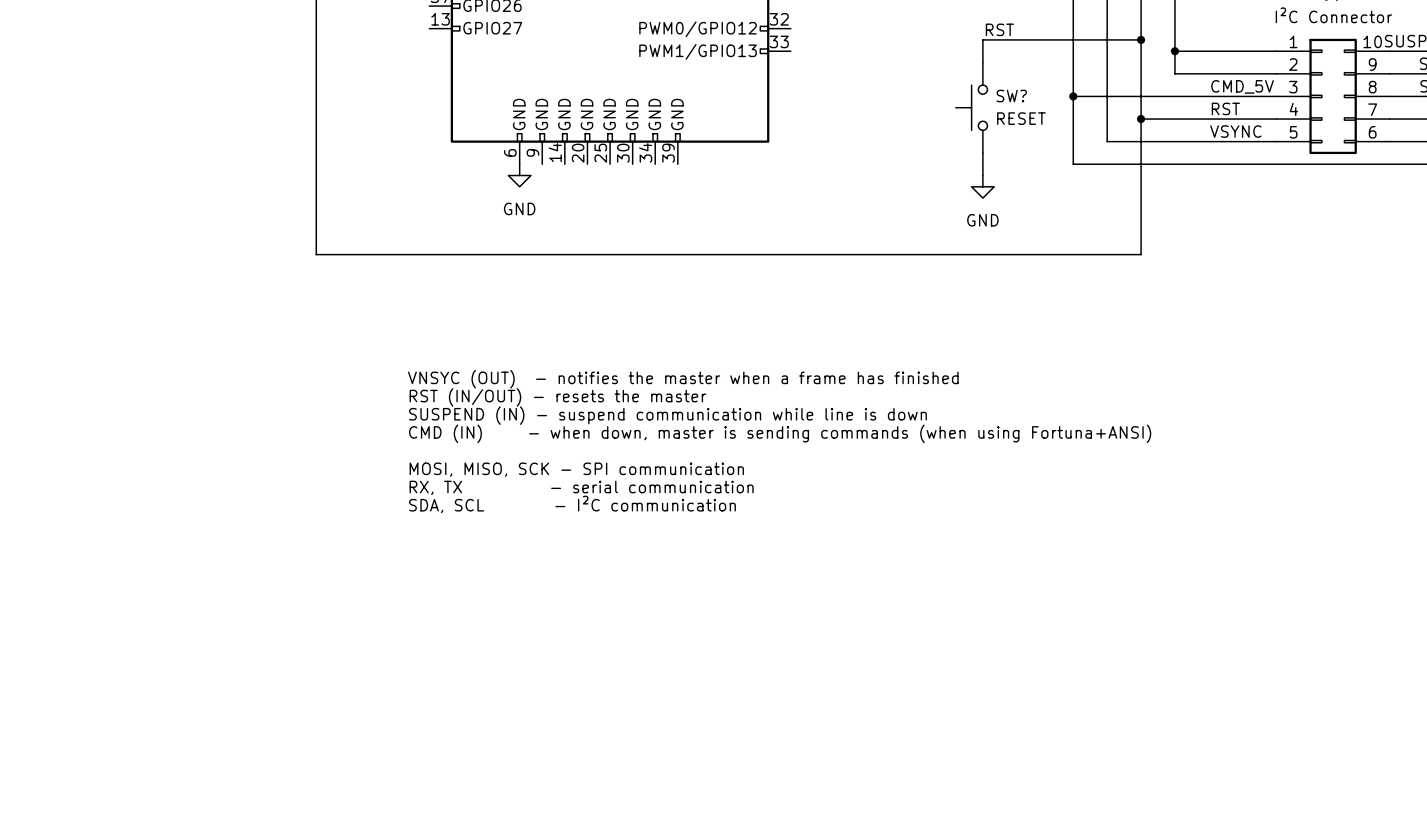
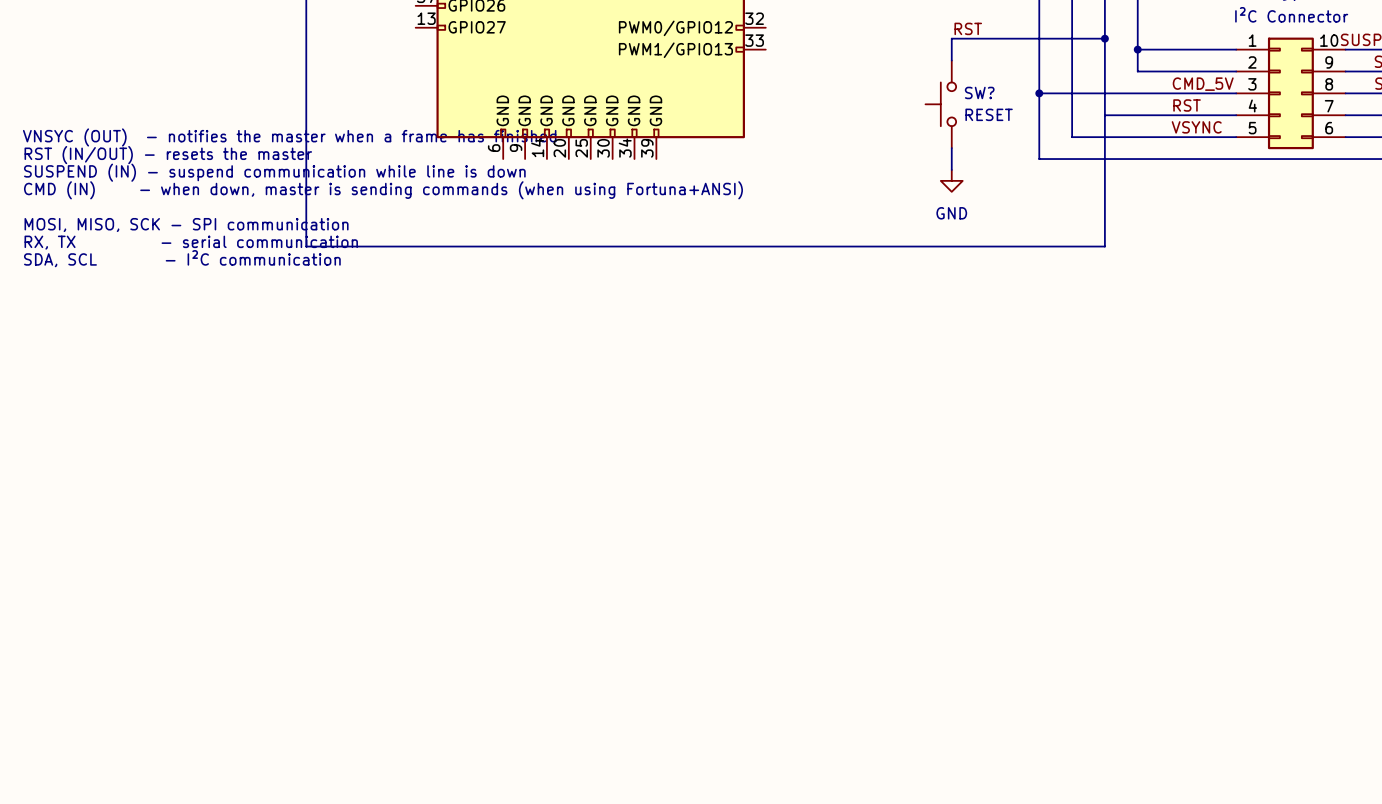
junction: (1141, 119) -> none
text: none -> VNSYC (OUT) - notifies the master when a frame has finished (289, 137)
text: none -> RST (IN/OUT) - resets the master (168, 155)
power symbol: GND (519, 175) -> none
text: none -> SUSPEND (IN) - suspend communication while line is down (274, 172)
text: none -> CMD (IN) - when down, master is sending commands (when using Fortuna+ANSI) (383, 190)
text: none -> MOSI, MISO, SCK - SPI communication (186, 225)
text: none -> RX, TX - serial communication (191, 242)
text: none -> SDA, SCL - I²C communication (182, 258)
text: VNSYC (OUT) - notifies the master when a frame has finished (683, 379) -> none
text: RST (IN/OUT) - resets the master (557, 397) -> none
text: SUSPEND (IN) - suspend communication while line is down (667, 415) -> none
text: CMD (IN) - when down, master is sending commands (when using Fortuna+ANSI) (780, 433) -> none
text: MOSI, MISO, SCK - SPI communication (576, 469) -> none
text: RX, TX - serial communication (581, 487) -> none
text: SDA, SCL - I²C communication (572, 504) -> none

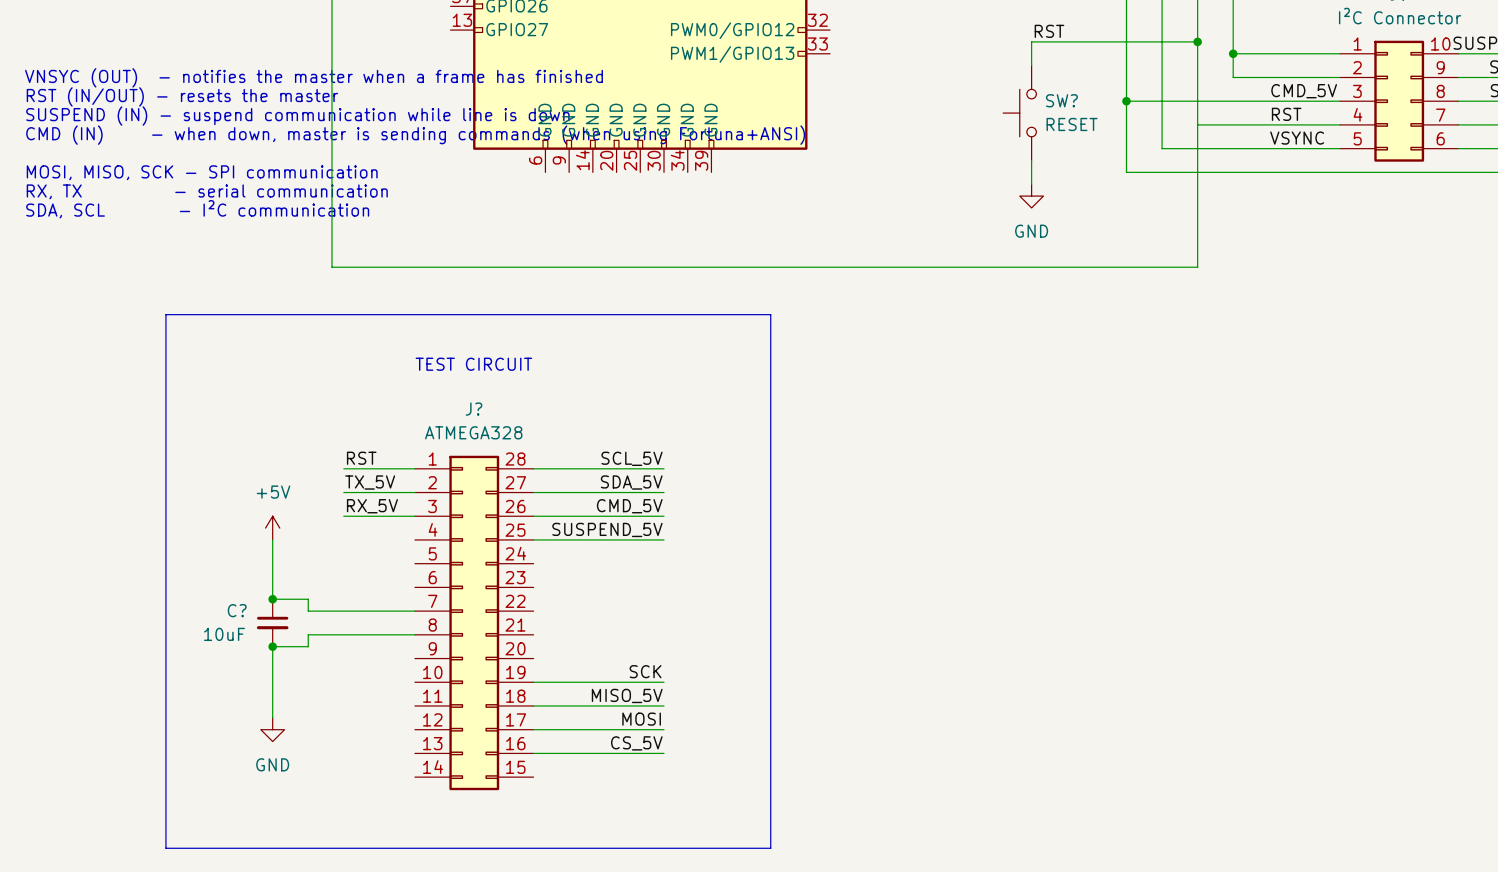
text position: VNSYC (OUT) - notifies the master when a frame has finished (289, 137) -> VNSYC (OUT) - notifies the master when a frame has finished (313, 77)
text position: RST (IN/OUT) - resets the master (168, 155) -> RST (IN/OUT) - resets the master (182, 96)
text position: SUSPEND (IN) - suspend communication while line is down (274, 172) -> SUSPEND (IN) - suspend communication while line is down (297, 116)
text position: CMD (IN) - when down, master is sending commands (when using Fortuna+ANSI) (383, 190) -> CMD (IN) - when down, master is sending commands (when using Fortuna+ANSI) (415, 135)
text position: MOSI, MISO, SCK - SPI communication (186, 225) -> MOSI, MISO, SCK - SPI communication (202, 172)
text position: RX, TX - serial communication (191, 242) -> RX, TX - serial communication (207, 191)
text position: SDA, SCL - I²C communication (182, 258) -> SDA, SCL - I²C communication (197, 209)
line: none -> (165, 314) (165, 848) (770, 848) (770, 314) (165, 314)
text: none -> TEST CIRCUIT (473, 364)
label: none -> RST (361, 458)
label: none -> SCL_5V (632, 458)
wire: none -> (343, 468) (414, 468)
wire: none -> (533, 468) (664, 468)
label: none -> TX_5V (370, 482)
label: none -> SDA_5V (631, 482)
wire: none -> (343, 492) (414, 492)
wire: none -> (533, 492) (664, 492)
label: none -> RX_5V (372, 506)
label: none -> CMD_5V (629, 506)
wire: none -> (343, 516) (414, 516)
wire: none -> (533, 516) (664, 516)
power symbol: none -> +5V (272, 528)
label: none -> SUSPEND_5V (607, 529)
wire: none -> (272, 539) (272, 599) (308, 599) (308, 611) (414, 611)
wire: none -> (533, 539) (664, 539)
junction: none -> (272, 599)
C?: none -> 10uF (272, 622)
J?: none -> ATMEGA328 (474, 622)
wire: none -> (414, 634) (308, 634) (308, 646) (272, 646) (272, 717)
junction: none -> (272, 646)
label: none -> SCK (645, 671)
wire: none -> (533, 682) (664, 682)
label: none -> MISO_5V (627, 695)
wire: none -> (533, 705) (664, 705)
label: none -> MOSI (641, 719)
power symbol: none -> GND (272, 729)
wire: none -> (533, 729) (664, 729)
label: none -> CS_5V (636, 743)
wire: none -> (533, 753) (664, 753)

